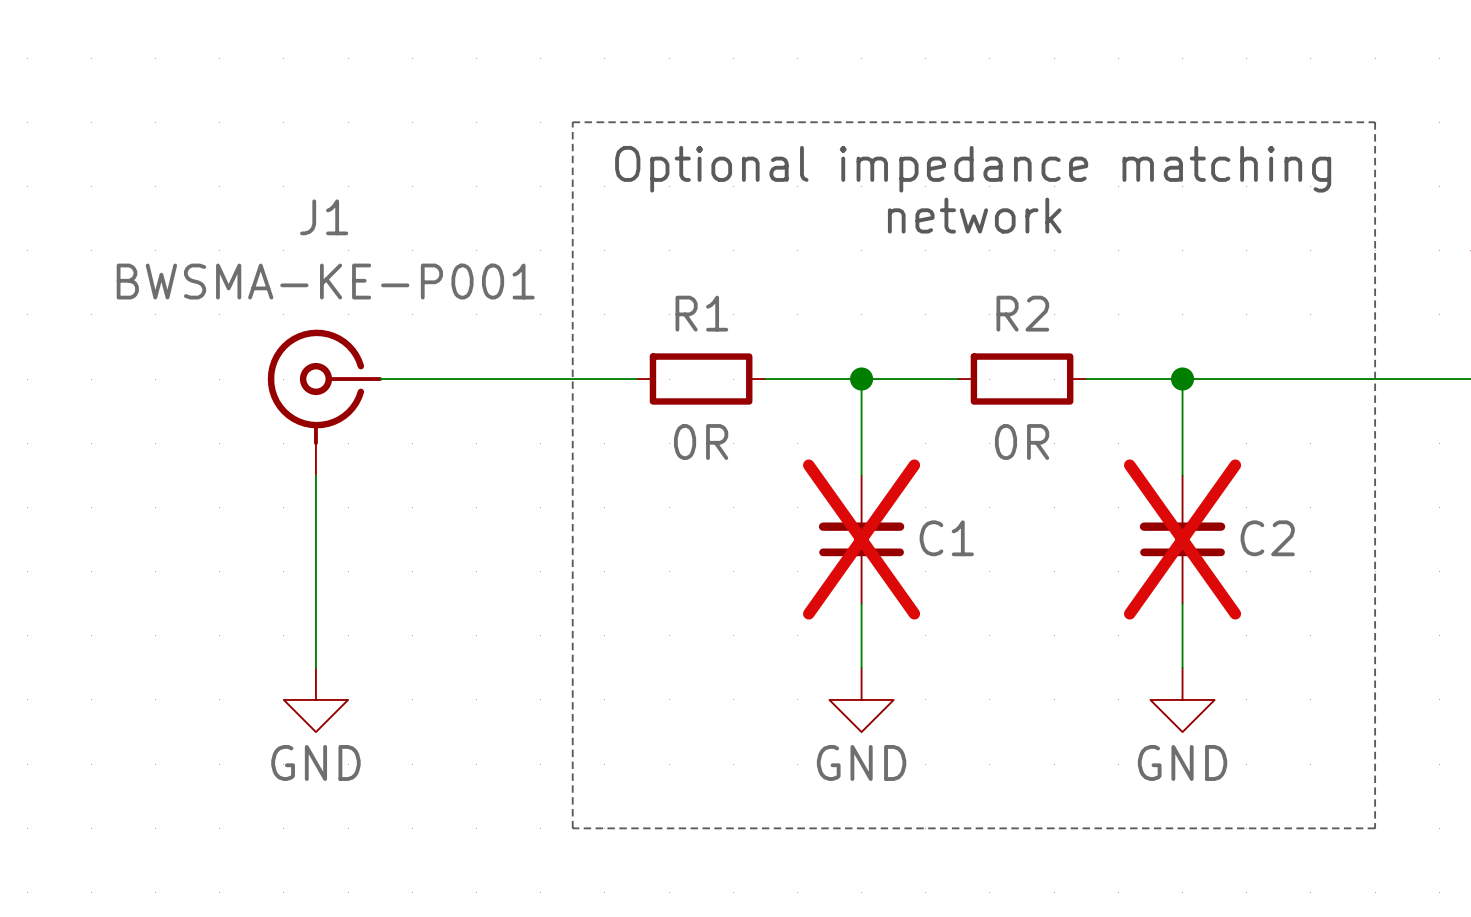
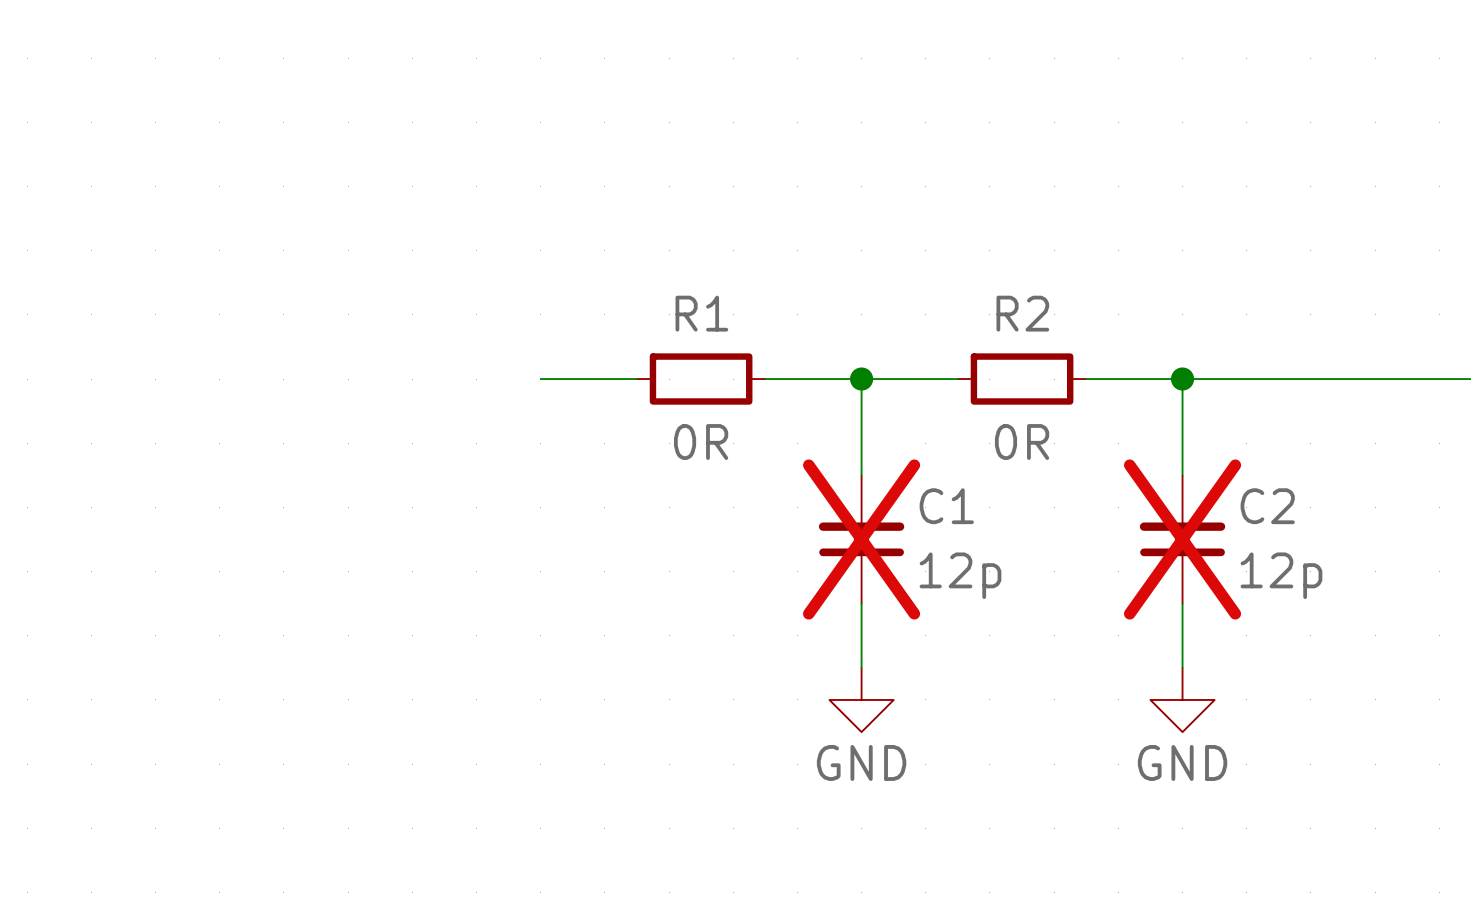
line: (572, 122) (1375, 122) (1375, 828) (572, 828) (572, 122) -> none
text: Optional impedance matching (973, 169) -> none
text: network (974, 215) -> none
wire: (380, 379) (540, 379) -> none
J1: (324, 402) -> none
wire: (315, 475) (315, 667) -> none
C1 name position: C1 (946, 538) -> C1 (946, 506)
C2 name position: C2 (1267, 538) -> C2 (1267, 506)
C1 text: none -> 12p (960, 575)
C2 text: none -> 12p (1281, 575)
power symbol: GND (315, 699) -> none

